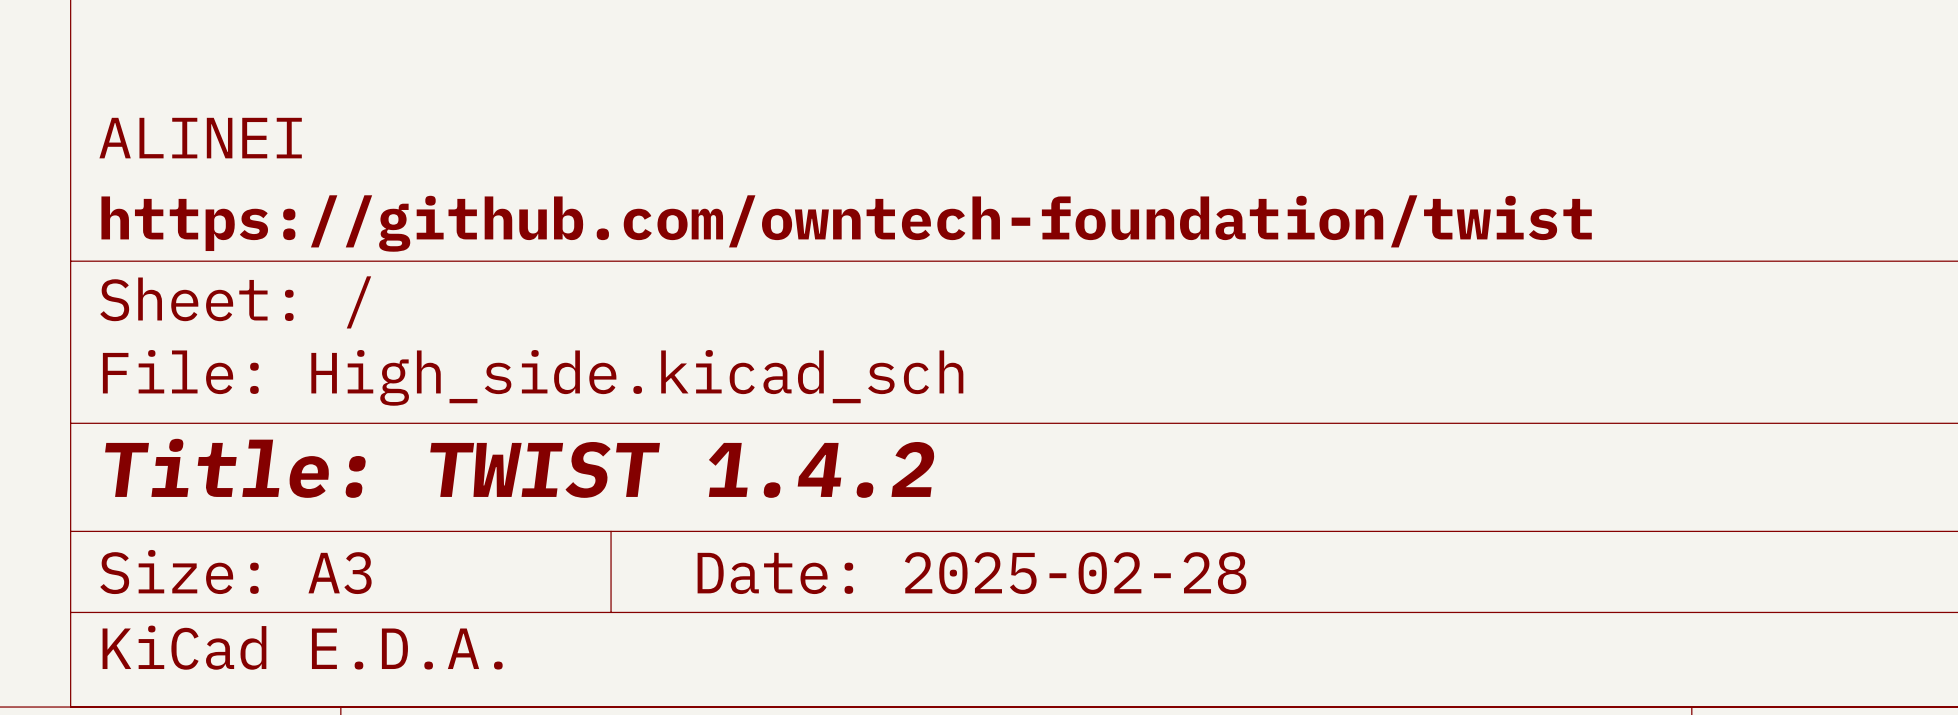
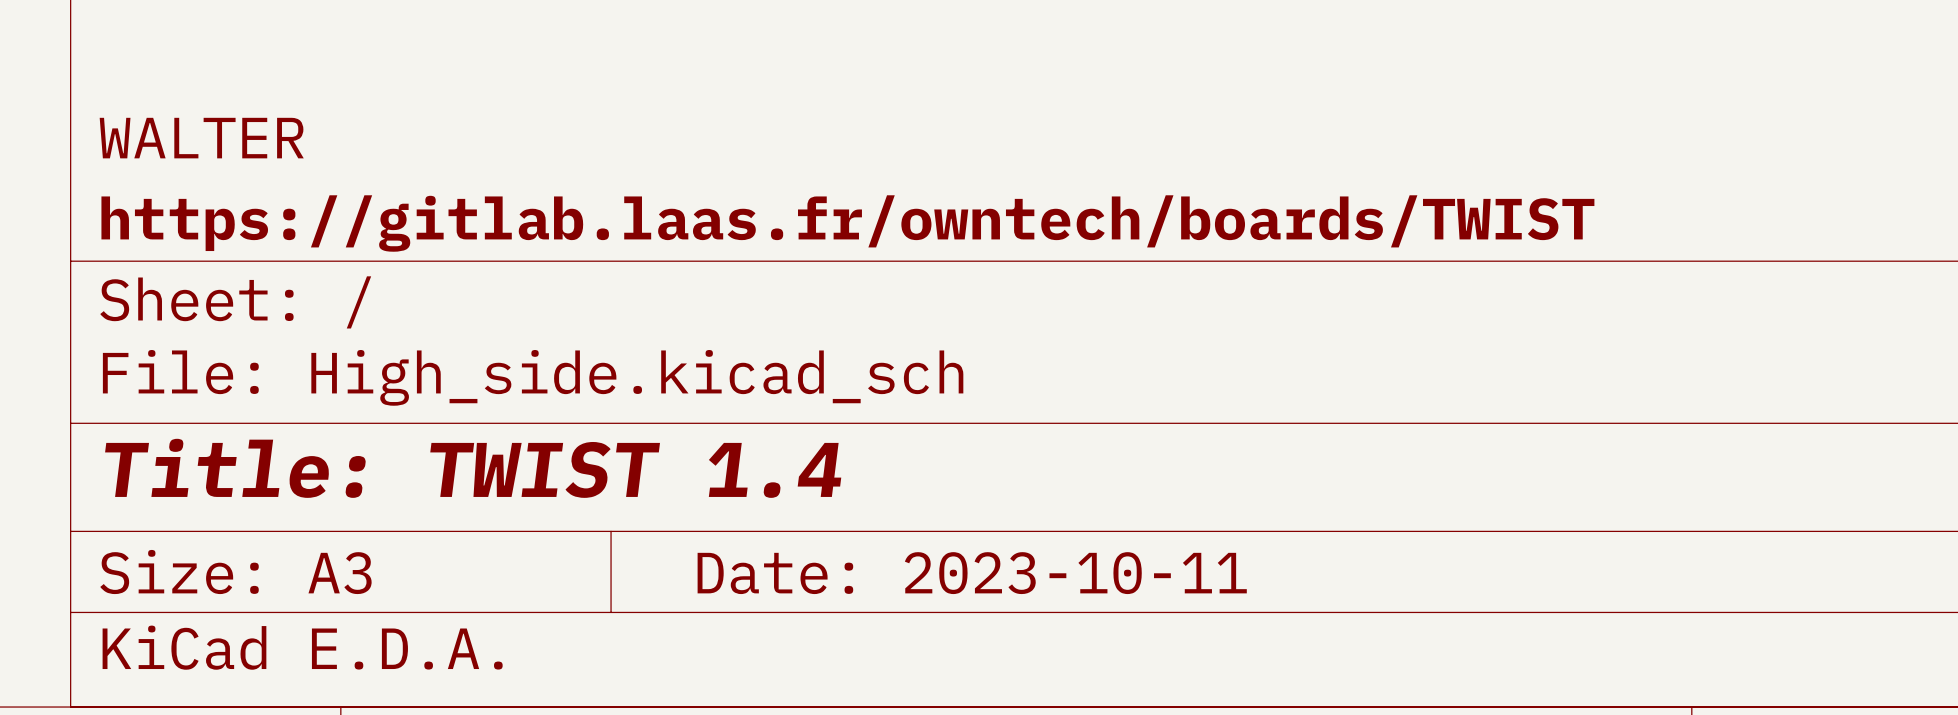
title block: ALINEI (200, 138) -> WALTER (201, 138)
title block: https://github.com/owntech-foundation/twist (846, 223) -> https://gitlab.laas.fr/owntech/boards/TWIST (847, 223)
title block: Title: TWIST 1.4.2 (519, 468) -> Title: TWIST 1.4 (473, 468)
title block: Date: 2025-02-28 (971, 573) -> Date: 2023-10-11 (972, 573)

